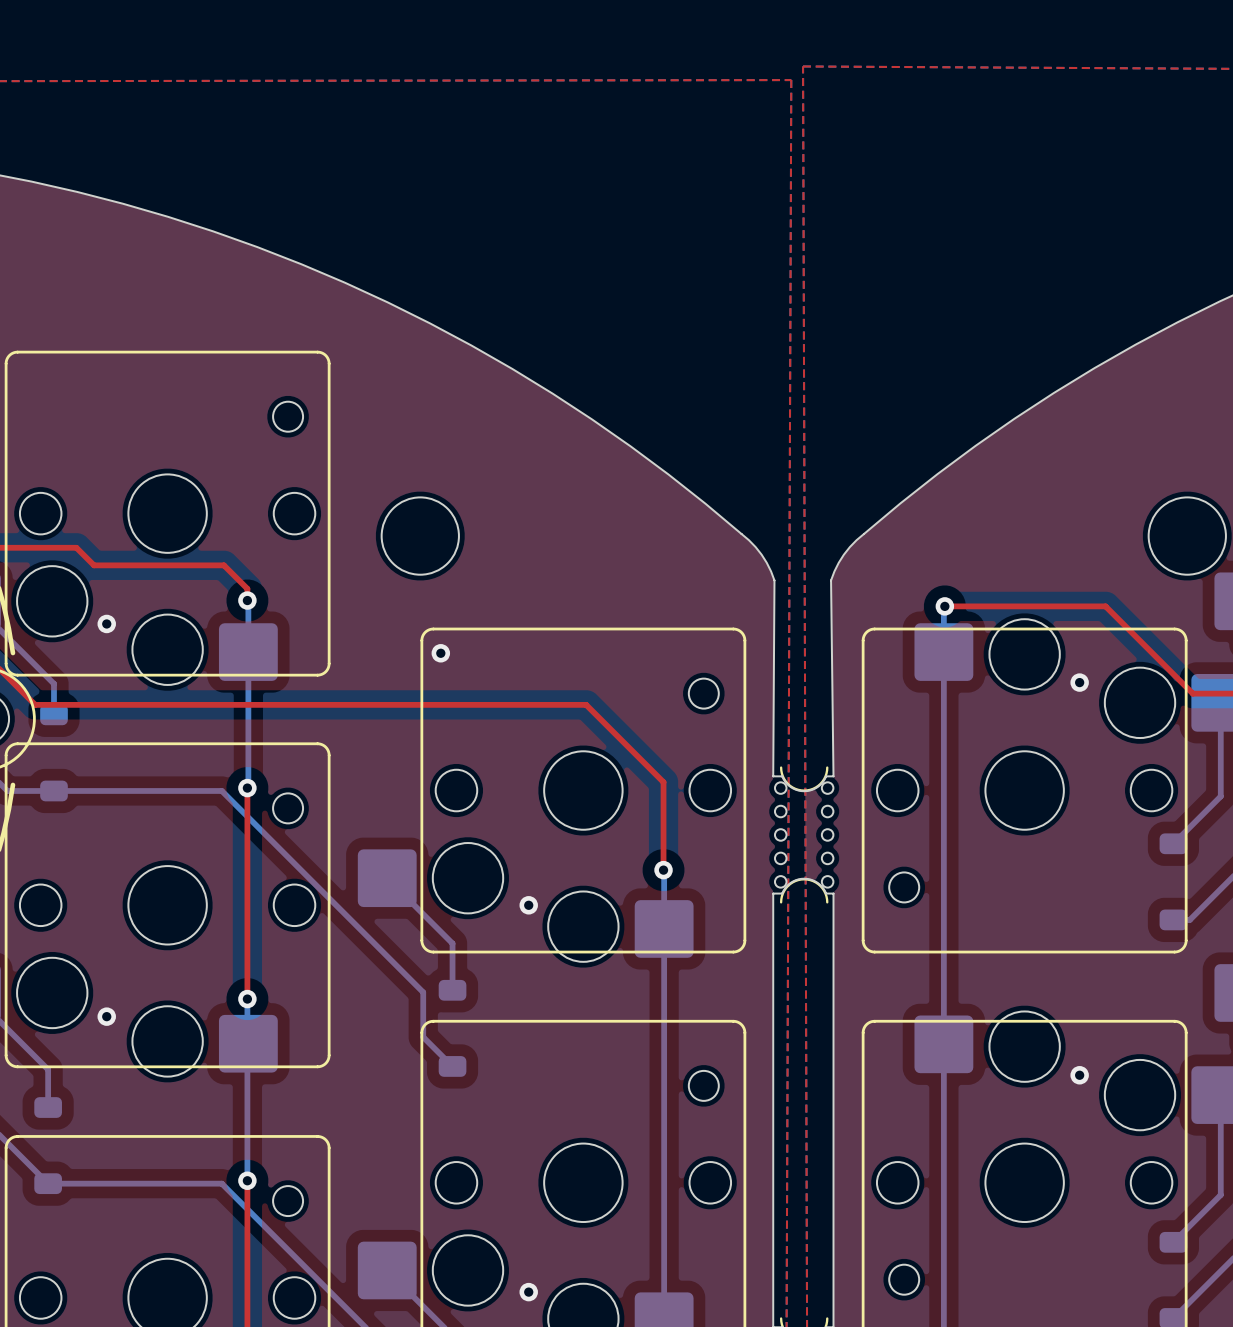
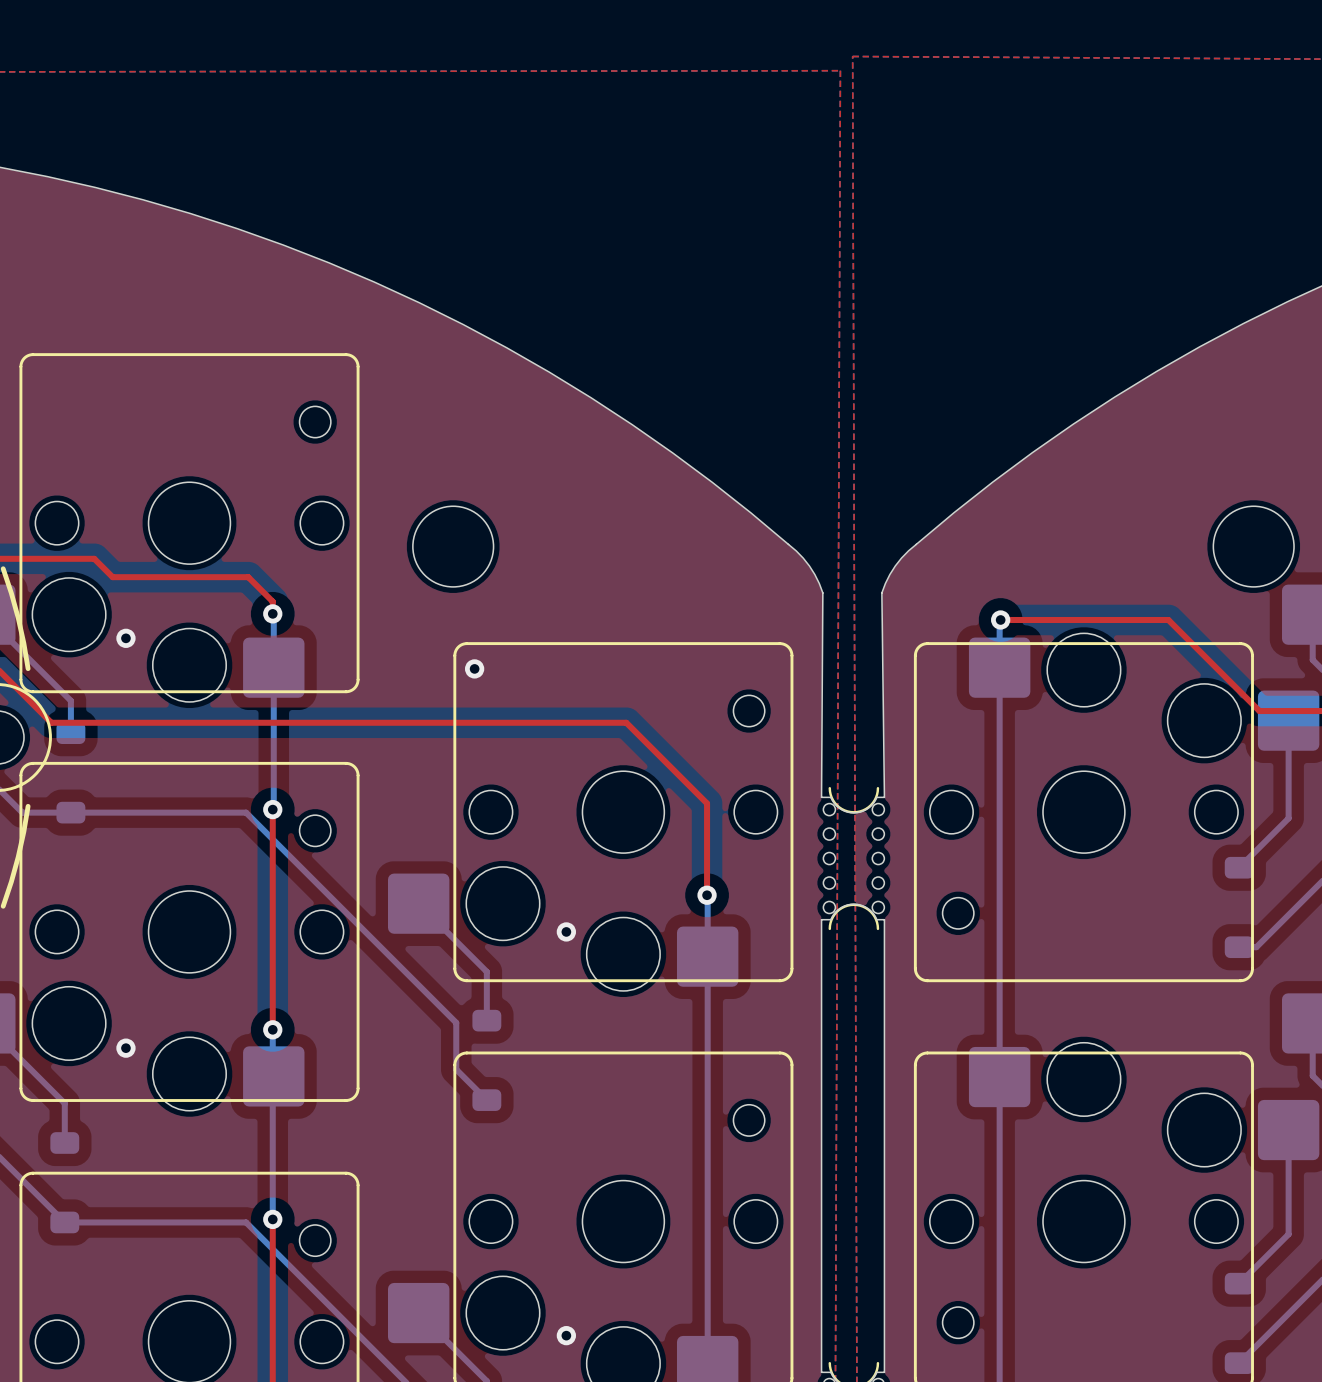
via: (1079, 682) -> none
via: (1079, 1075) -> none

